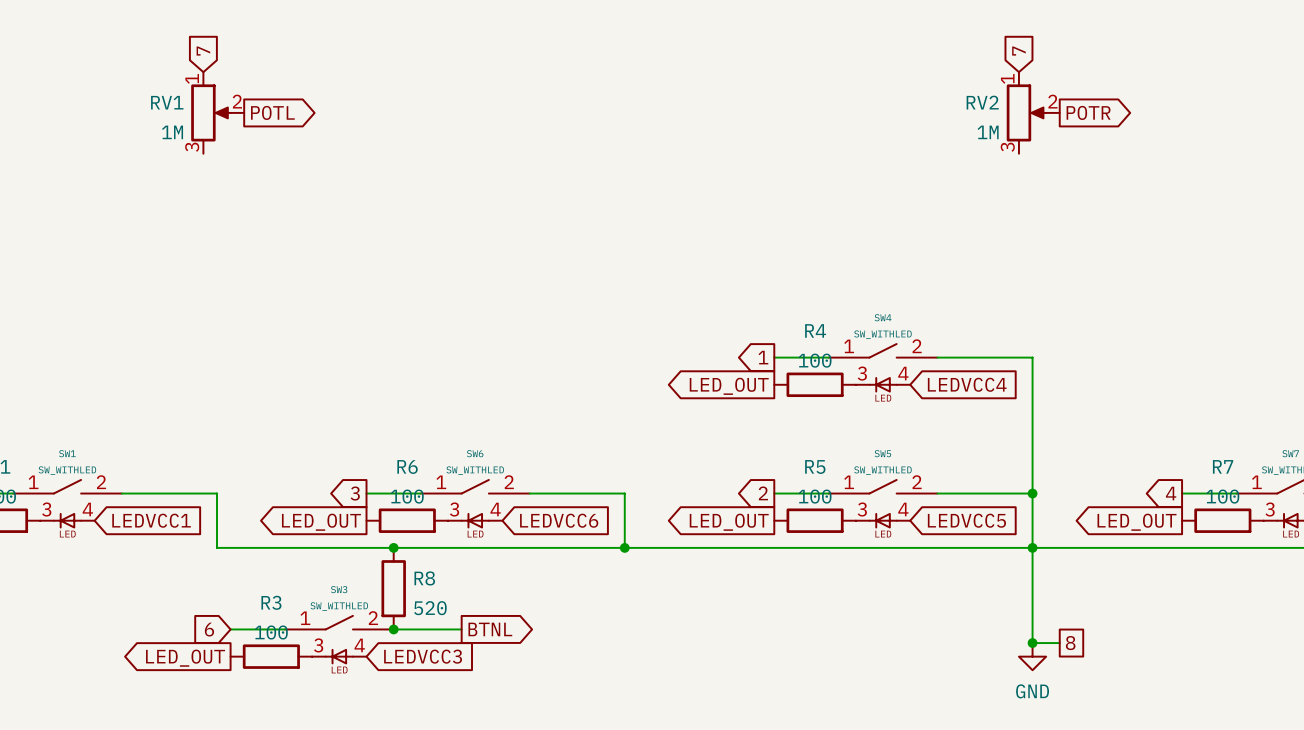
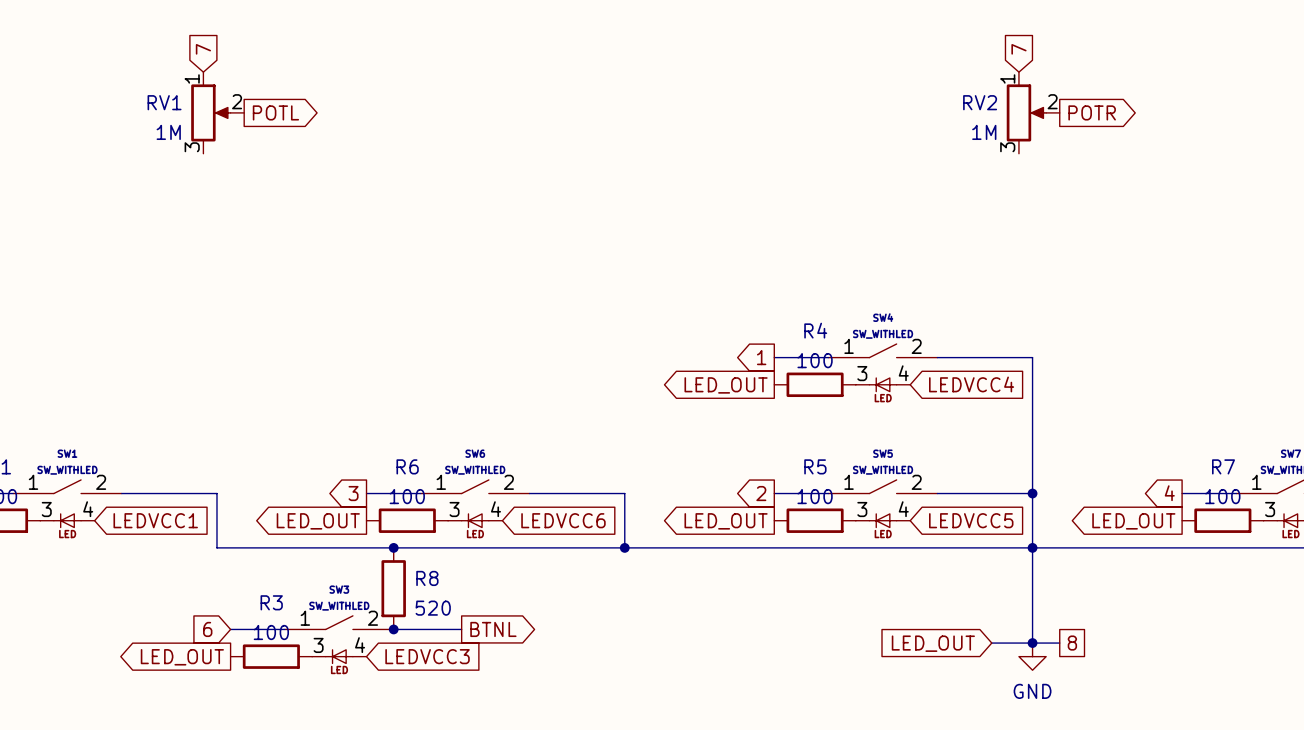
wire: none -> (991, 643) (1032, 643)
global label: none -> LED_OUT (933, 643)

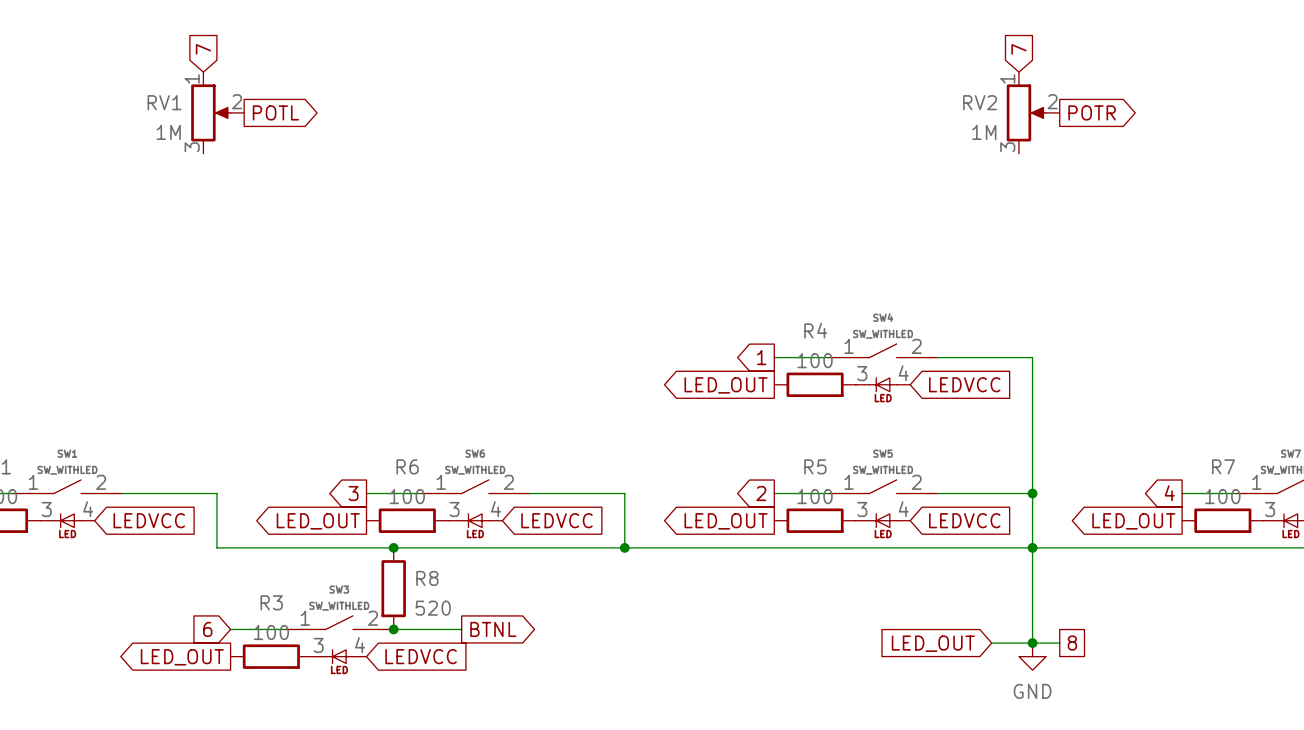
global label: LEDVCC4 (971, 384) -> LEDVCC (964, 384)
global label: LEDVCC1 (155, 520) -> LEDVCC (149, 520)
global label: LEDVCC6 (563, 520) -> LEDVCC (556, 520)
global label: LEDVCC5 (971, 520) -> LEDVCC (964, 520)
global label: LEDVCC3 (427, 656) -> LEDVCC (421, 656)

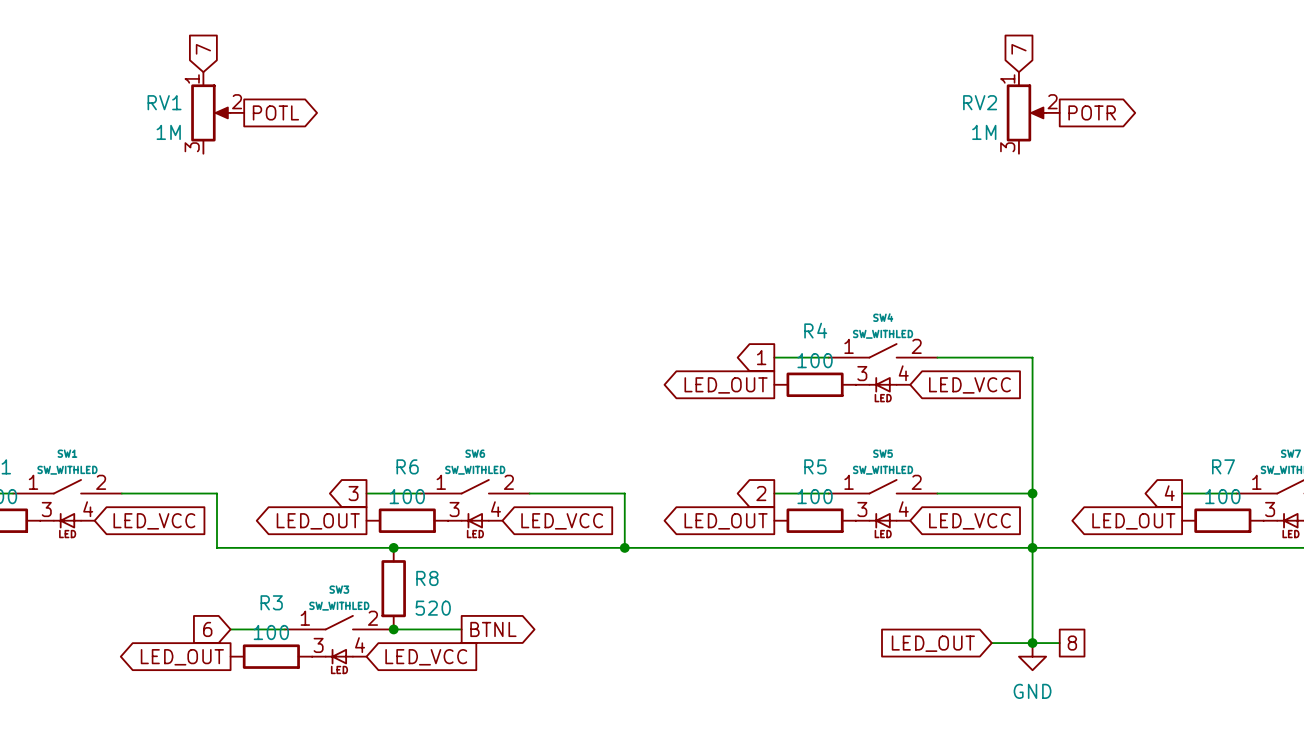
global label: LEDVCC (964, 384) -> LED_VCC (969, 385)
global label: LEDVCC (149, 520) -> LED_VCC (154, 521)
global label: LEDVCC (556, 520) -> LED_VCC (562, 521)
global label: LEDVCC (964, 520) -> LED_VCC (969, 521)
global label: LEDVCC (421, 656) -> LED_VCC (426, 657)

